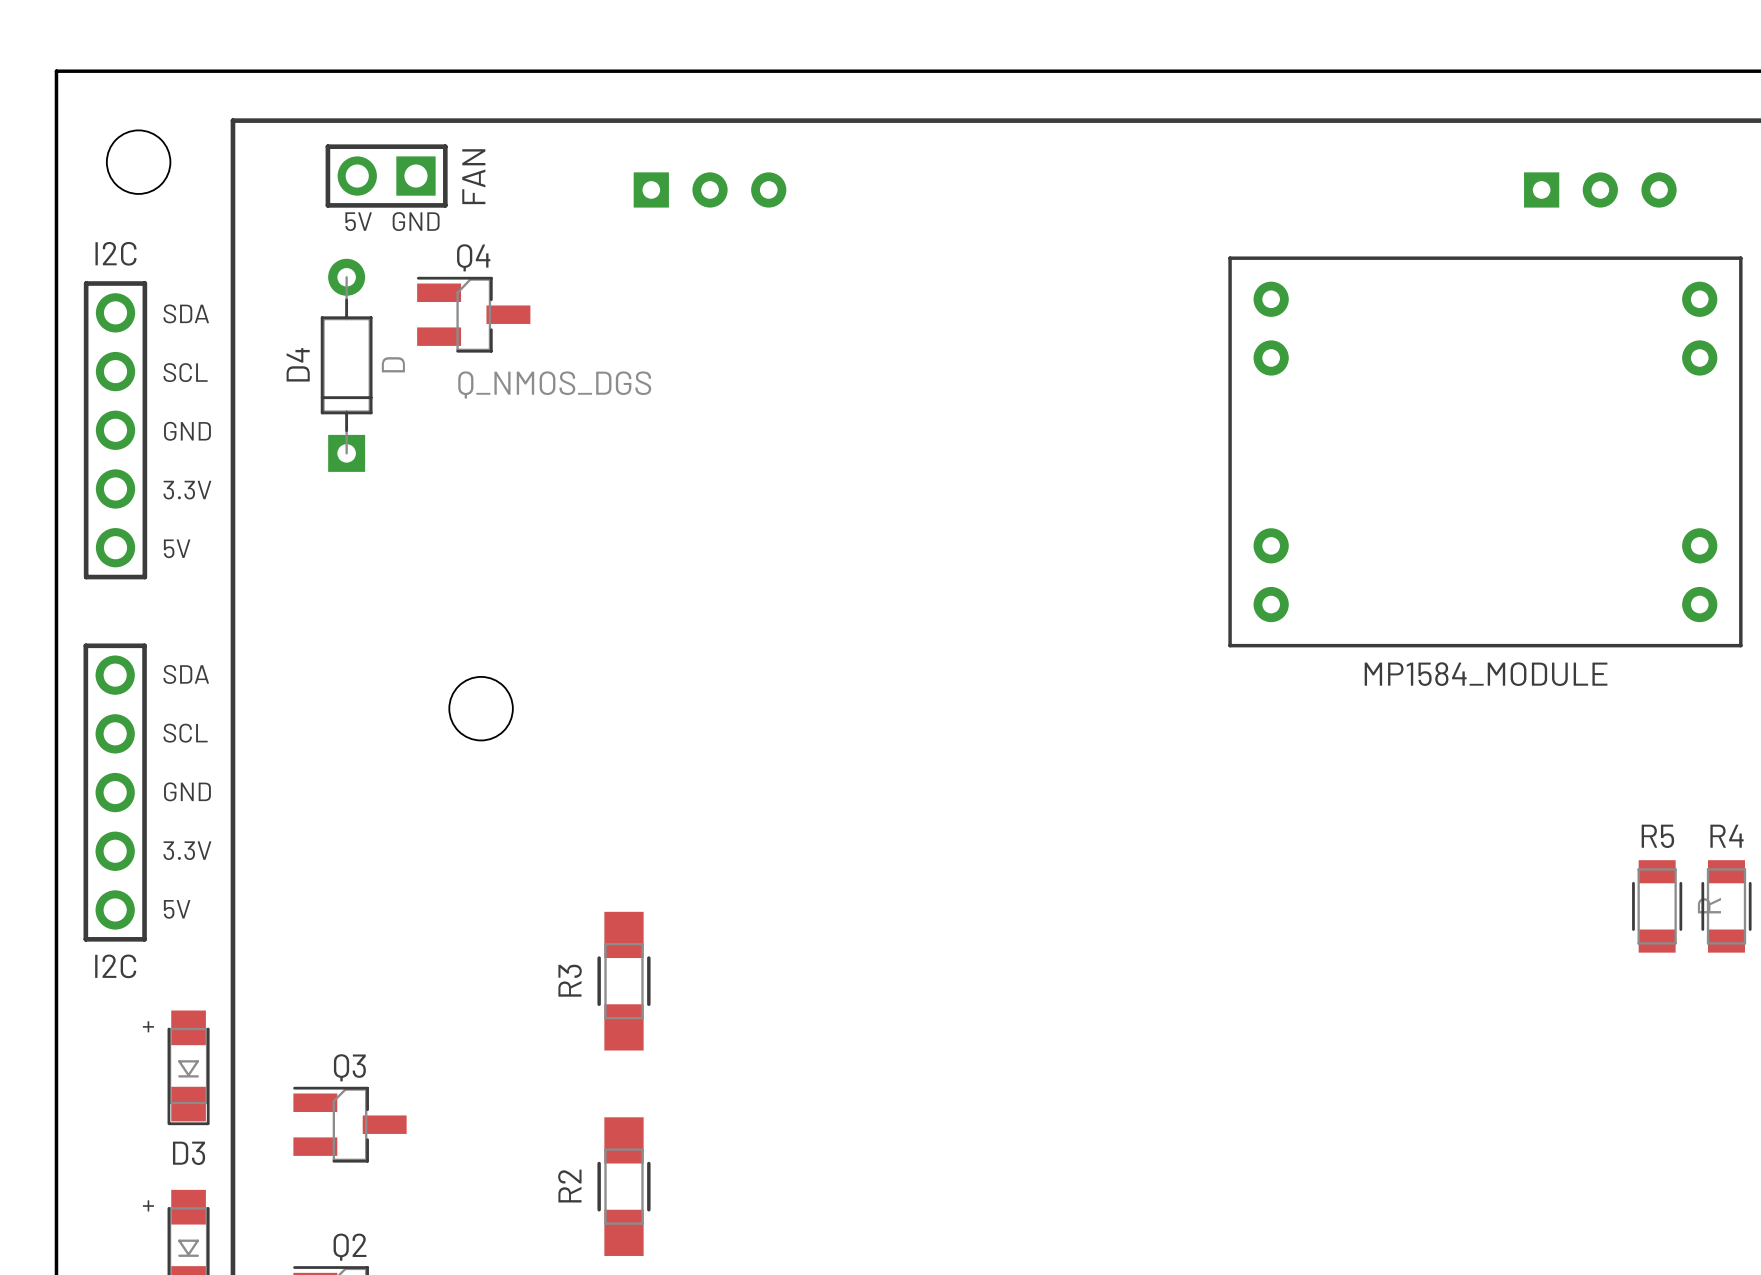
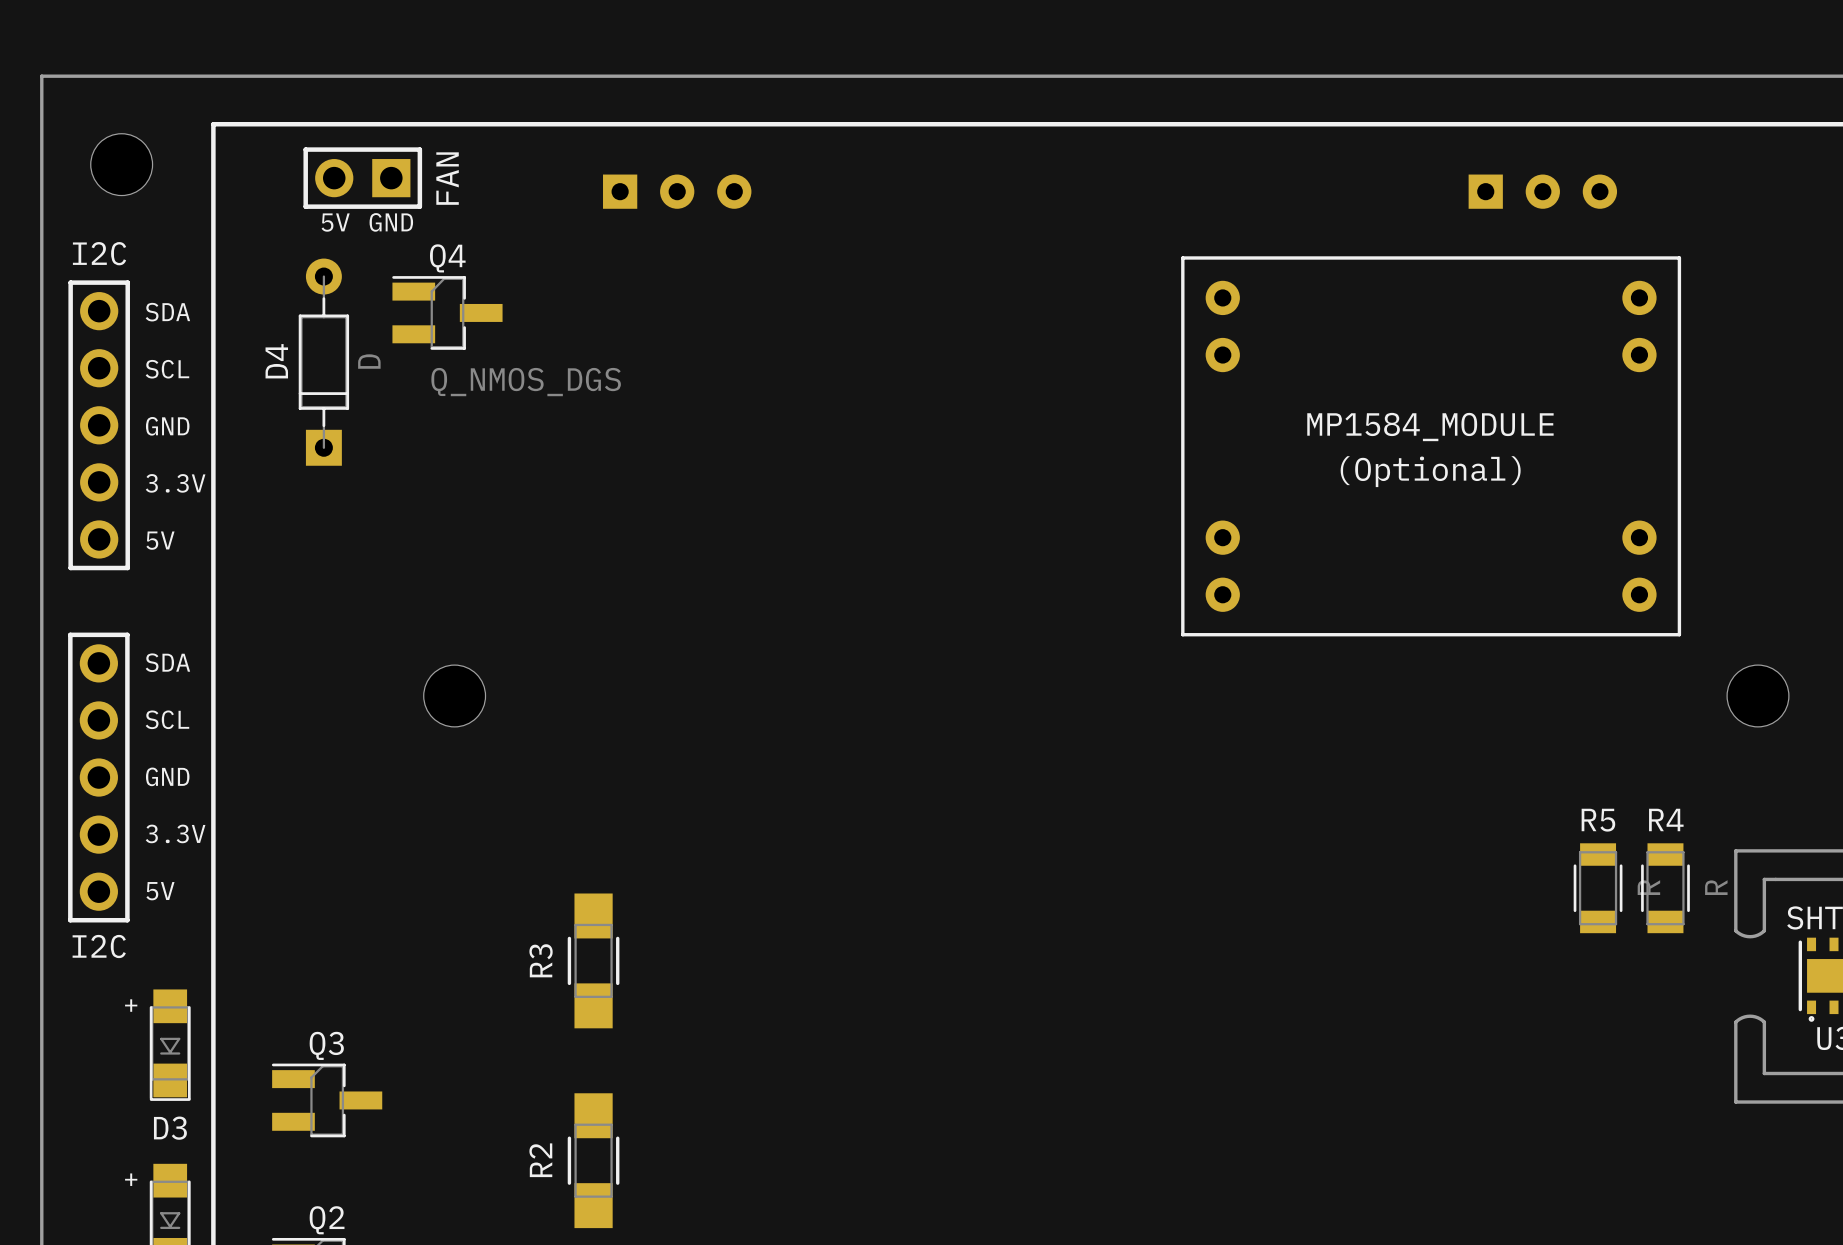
text: none -> (Optional) (1430, 471)
part value position: MP1584_MODULE (1486, 674) -> MP1584_MODULE (1430, 427)

